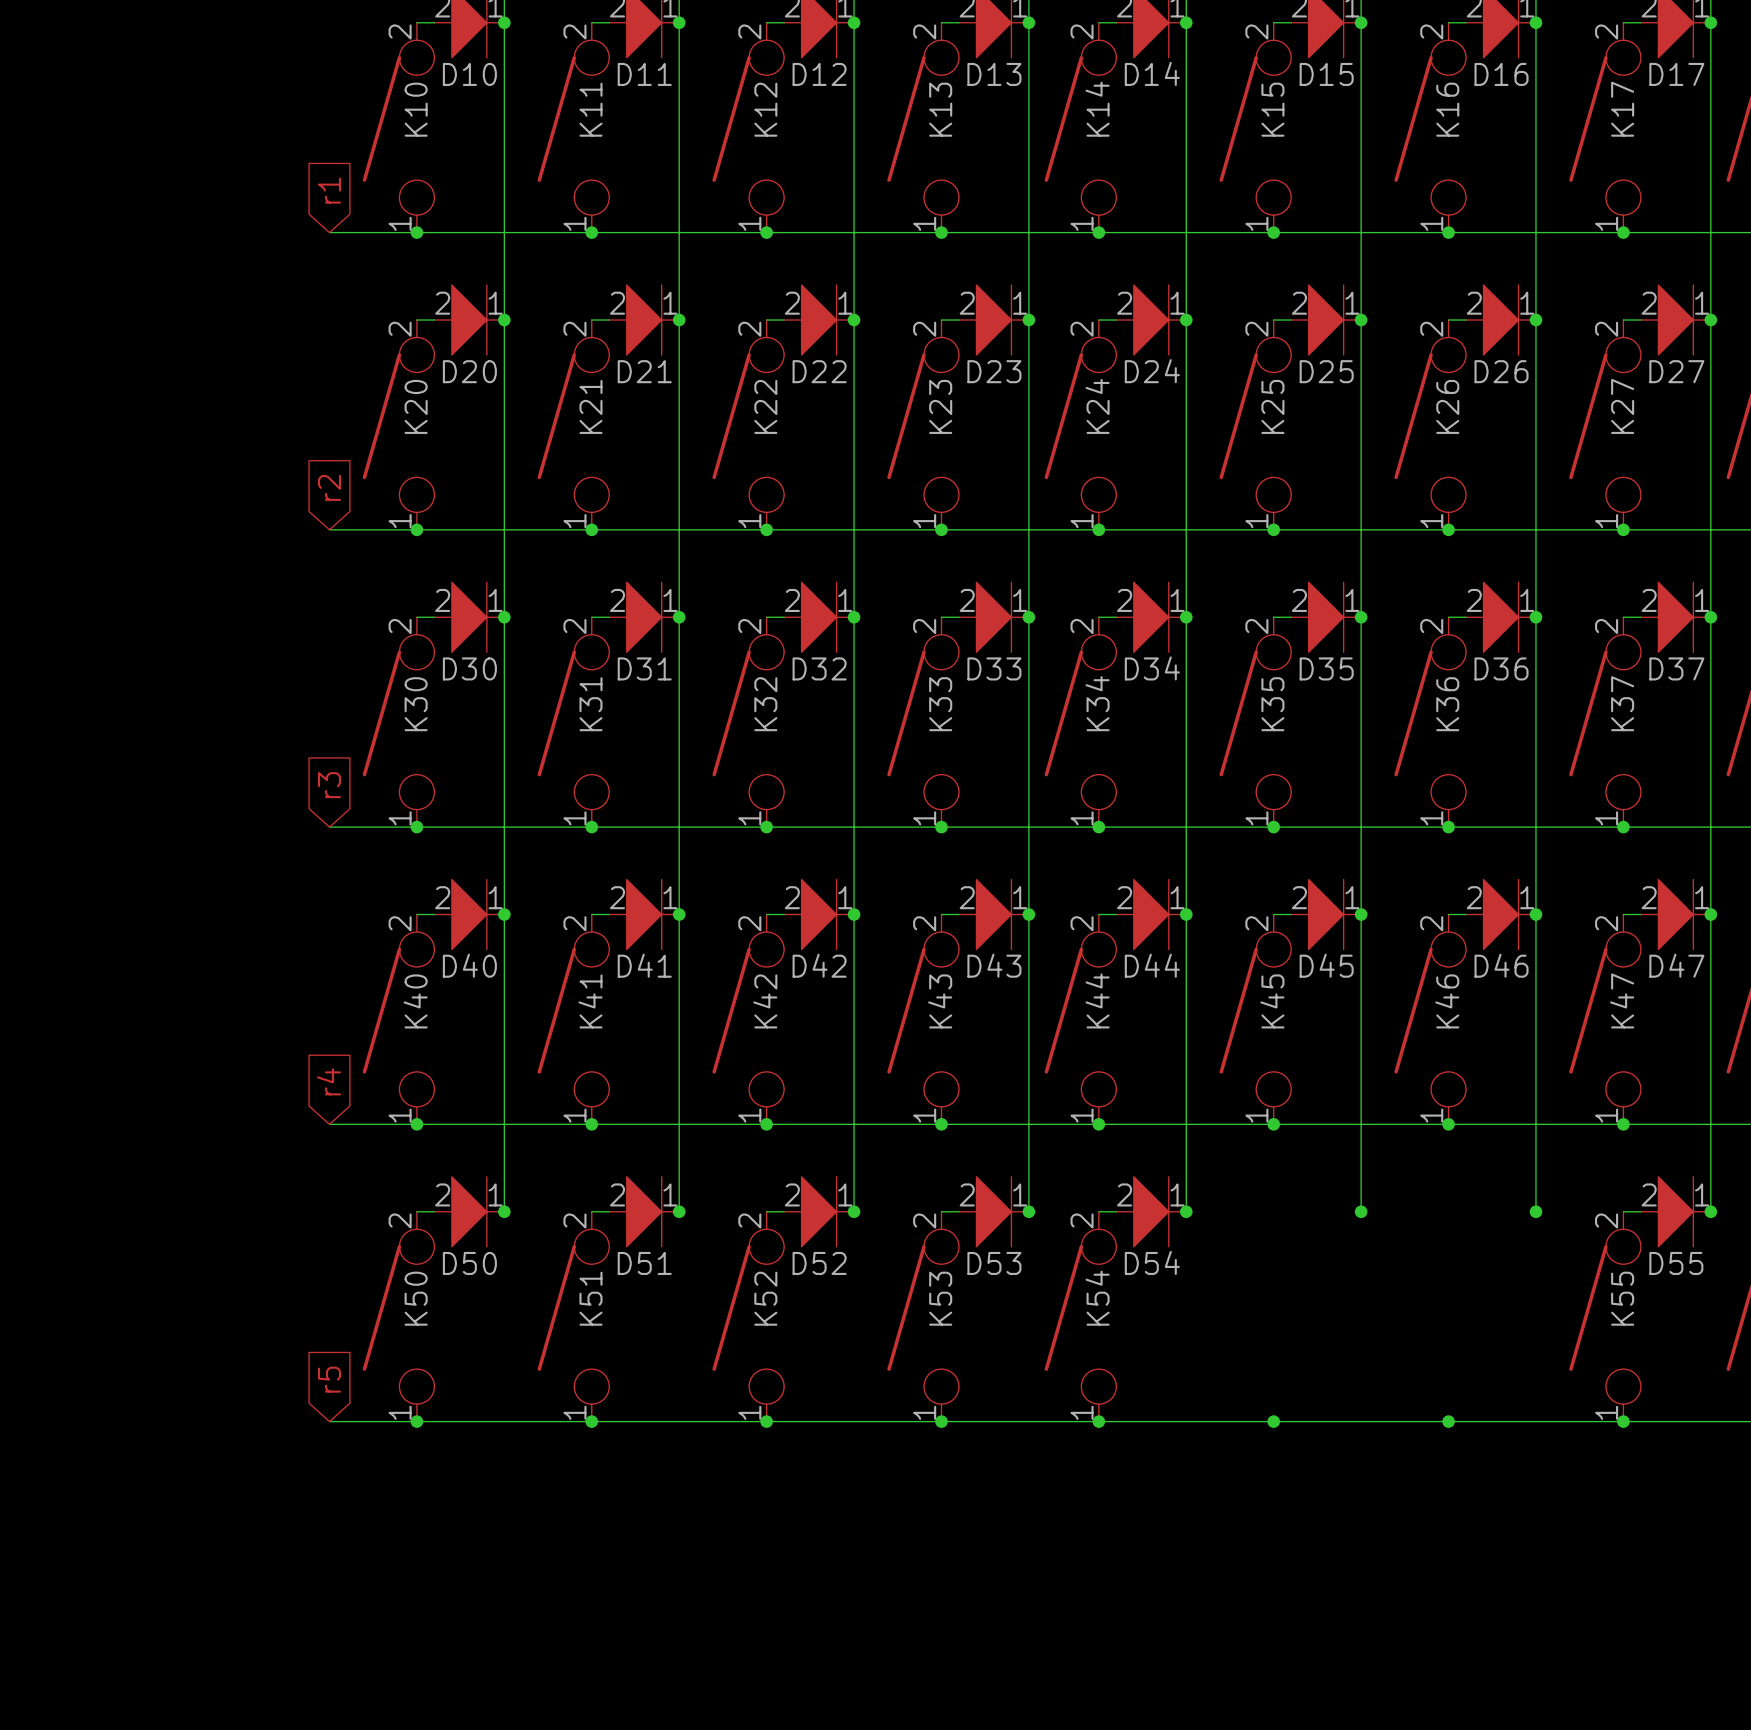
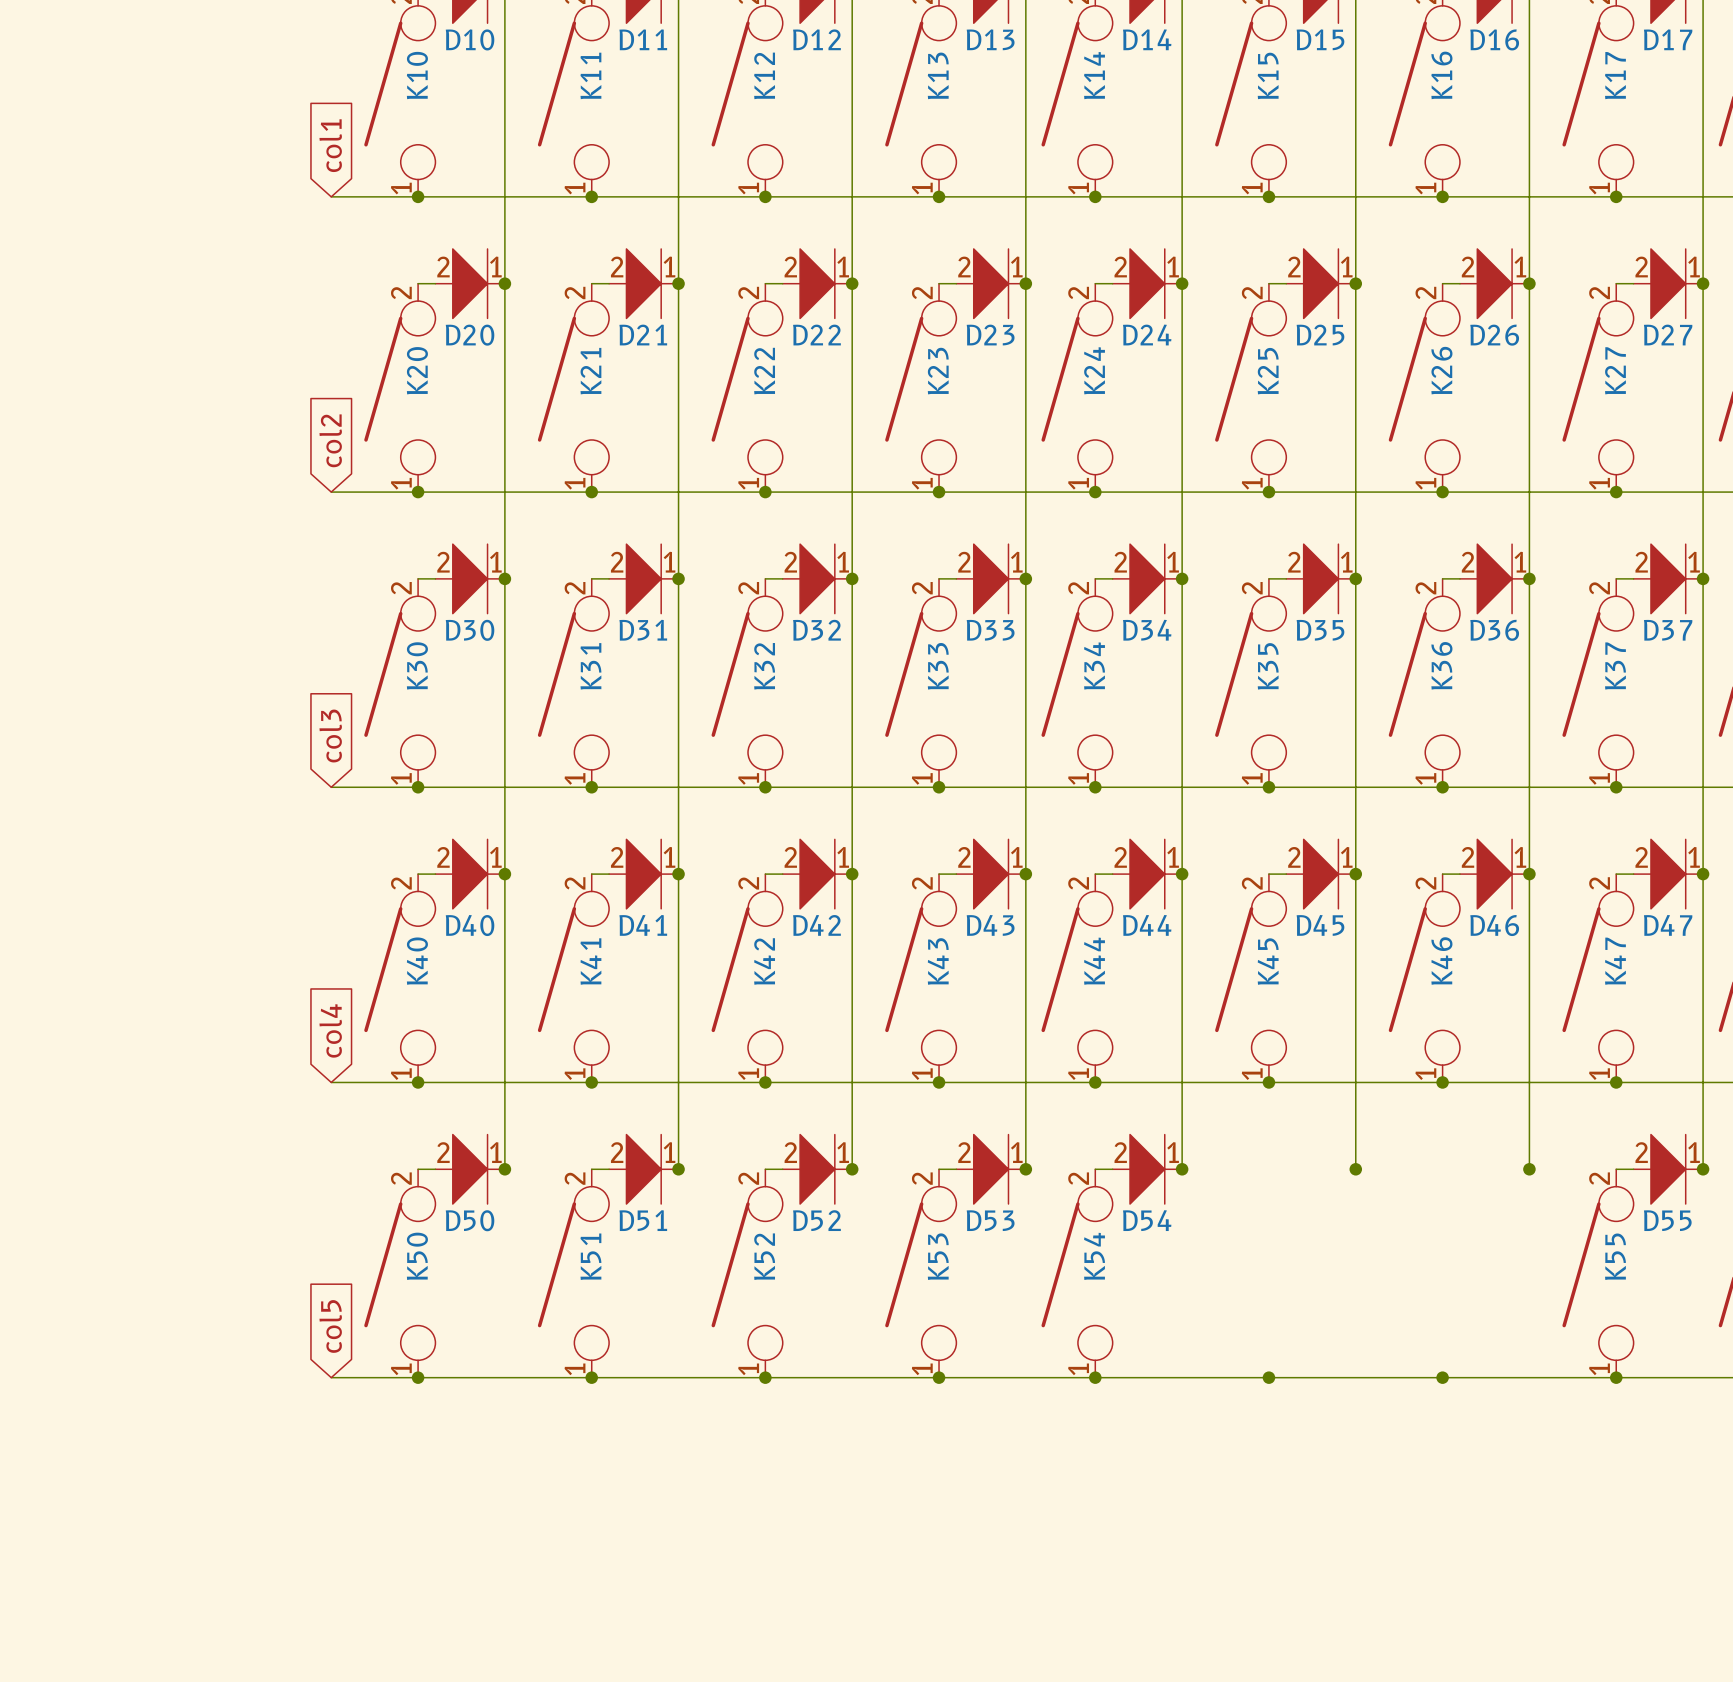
global label: r1 (329, 190) -> col1 (330, 145)
global label: r2 (329, 487) -> col2 (330, 440)
global label: r3 (329, 785) -> col3 (330, 736)
global label: r4 (328, 1081) -> col4 (330, 1030)
global label: r5 (329, 1379) -> col5 (330, 1326)

